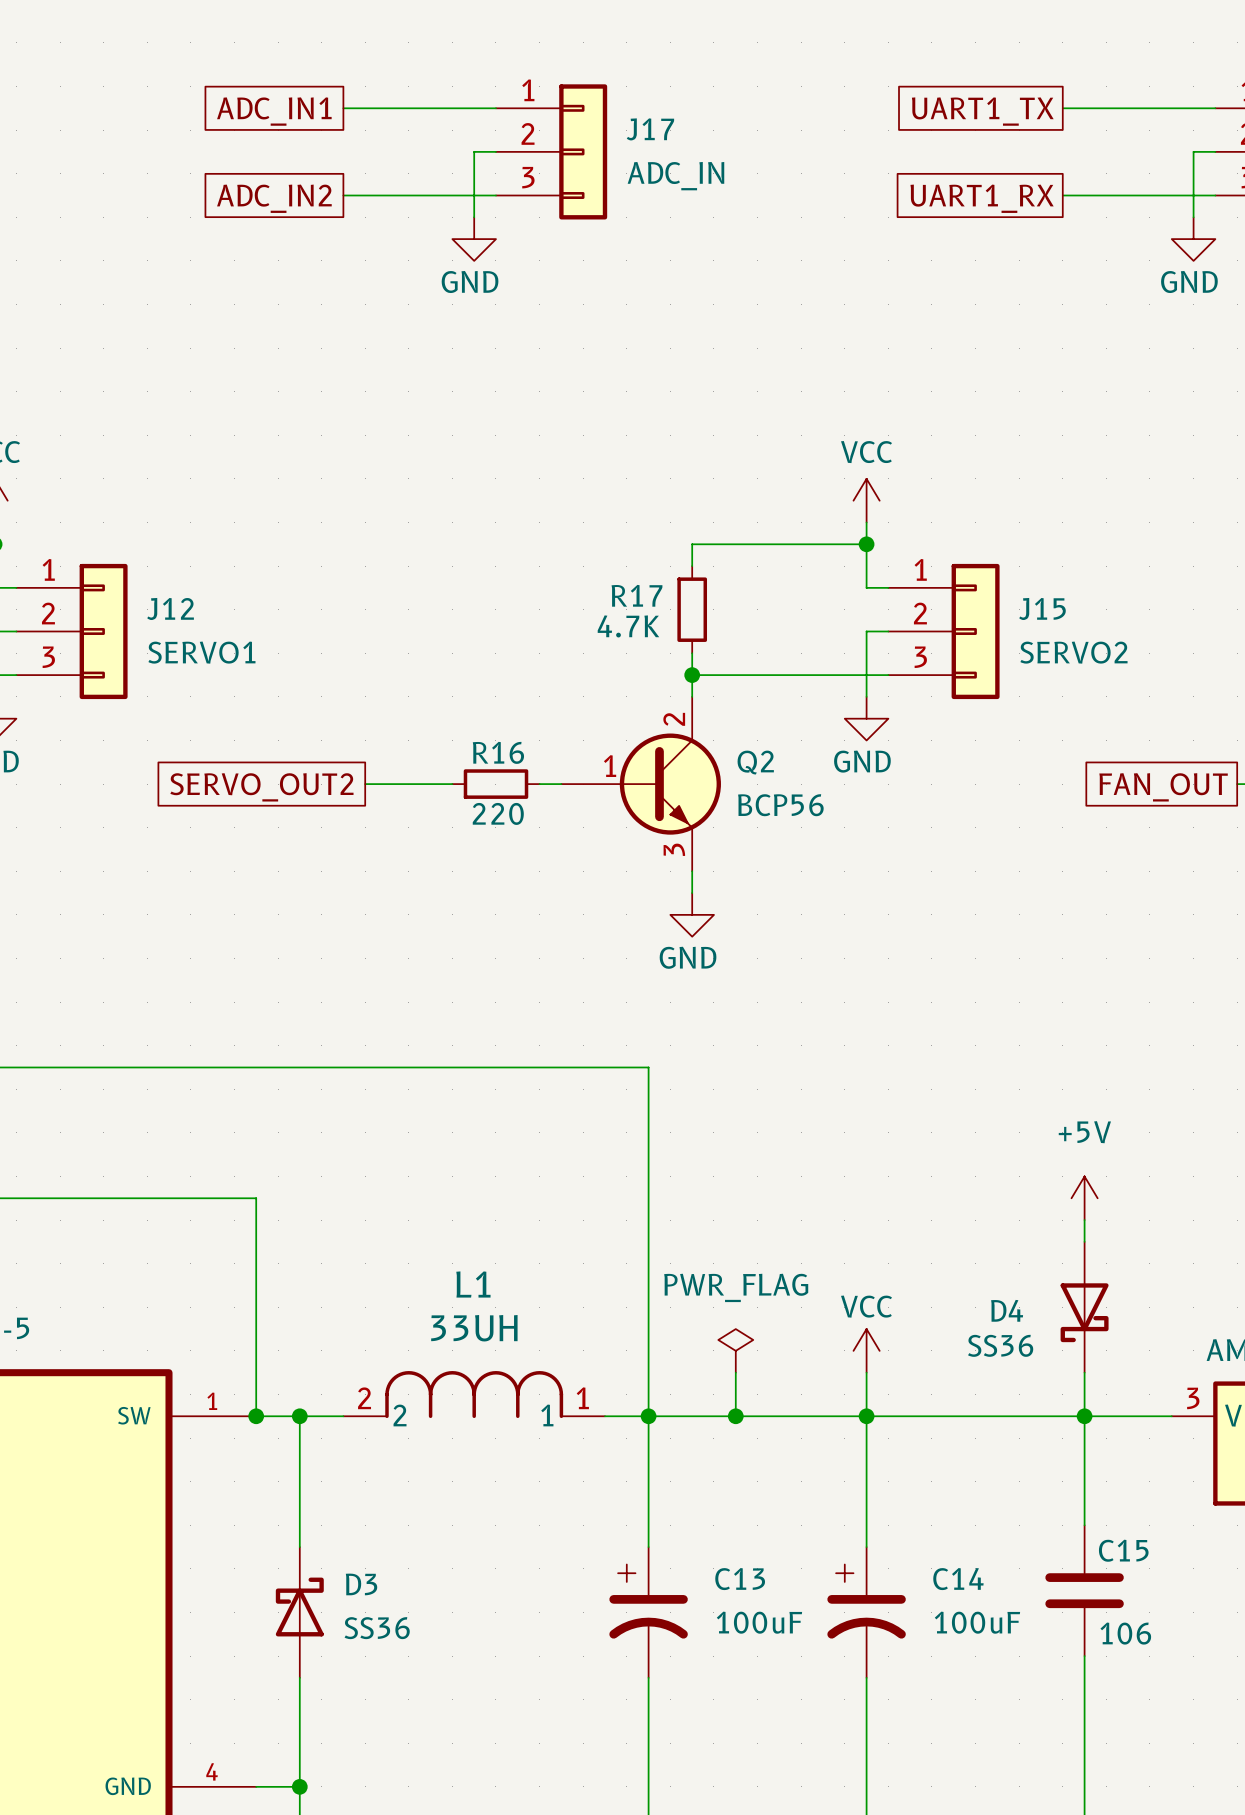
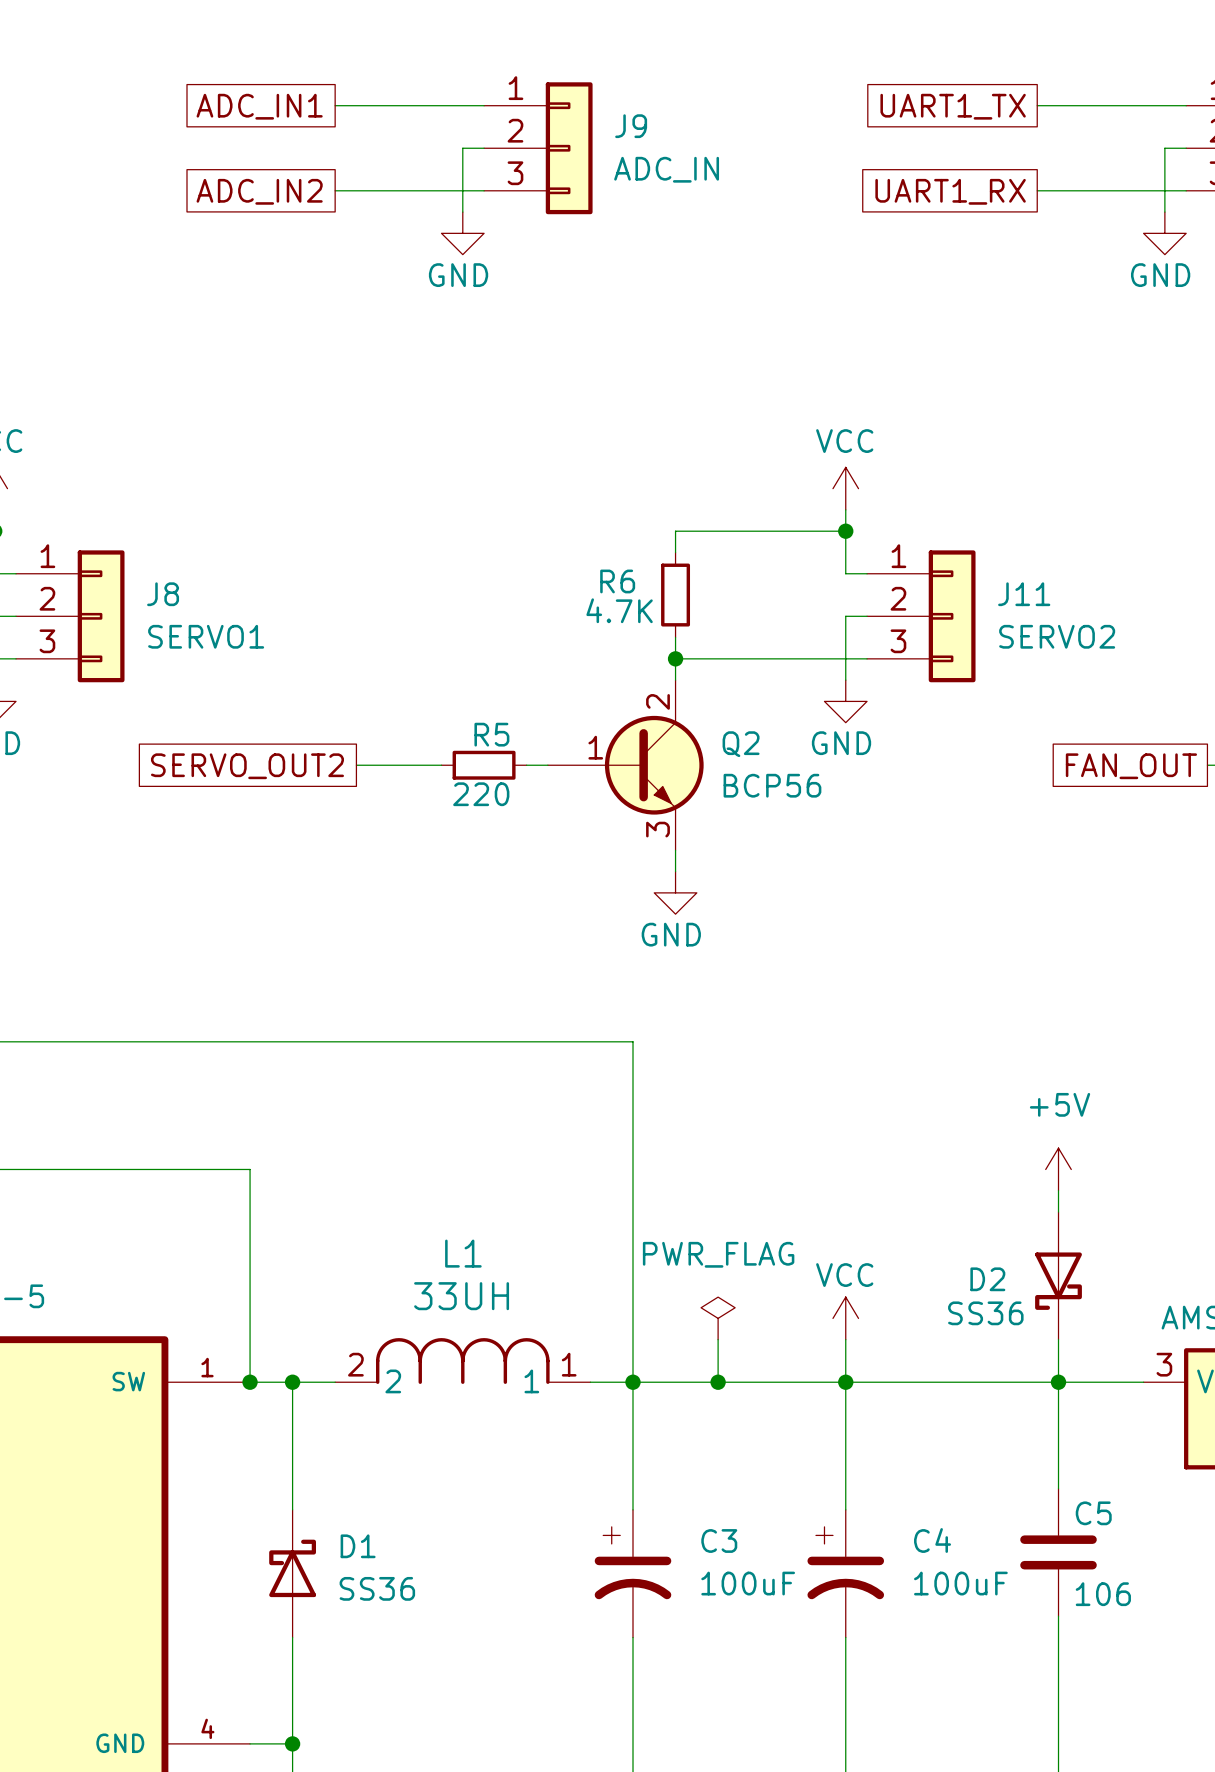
J17 name: J17 (650, 129) -> J9 (631, 126)
R17 name: R17 (636, 595) -> R6 (617, 581)
J12 name: J12 (170, 608) -> J8 (163, 594)
J15 name: J15 (1042, 608) -> J11 (1024, 594)
R16 name: R16 (498, 752) -> R5 (491, 734)
D4 name: D4 (1007, 1310) -> D2 (987, 1279)
C15 name: C15 (1123, 1550) -> C5 (1093, 1513)
C13 name: C13 (740, 1579) -> C3 (719, 1540)
C14 name: C14 (958, 1579) -> C4 (932, 1540)
D3 name: D3 (361, 1584) -> D1 (358, 1546)

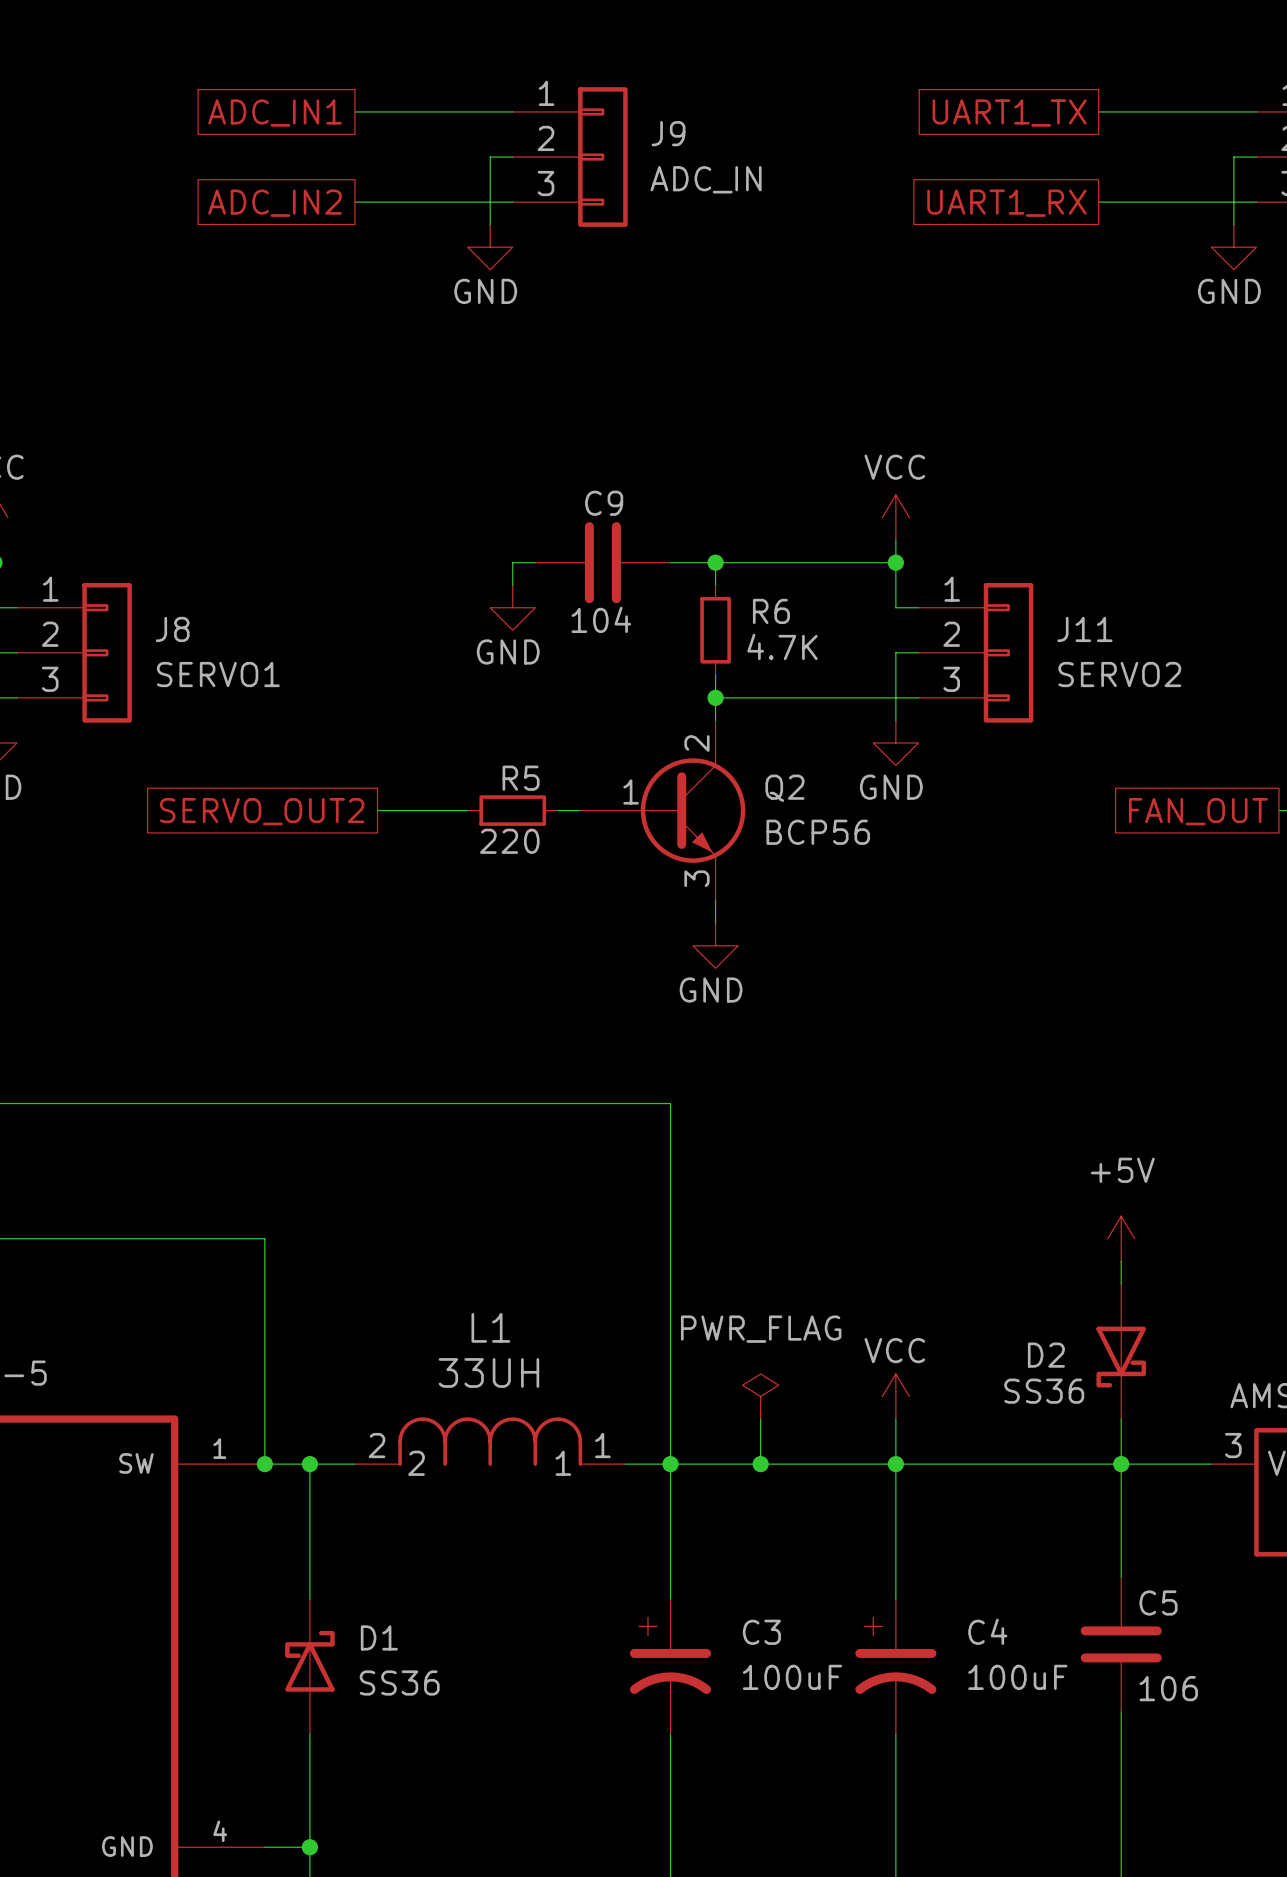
wire: none -> (535, 562) (512, 562) (512, 585)
C9: none -> 104 (602, 562)
wire: none -> (670, 562) (715, 562)
junction: none -> (715, 562)
power symbol: none -> GND (512, 607)
R6 name position: R6 (617, 581) -> R6 (771, 611)
R6 value position: 4.7K (619, 610) -> 4.7K (782, 646)

